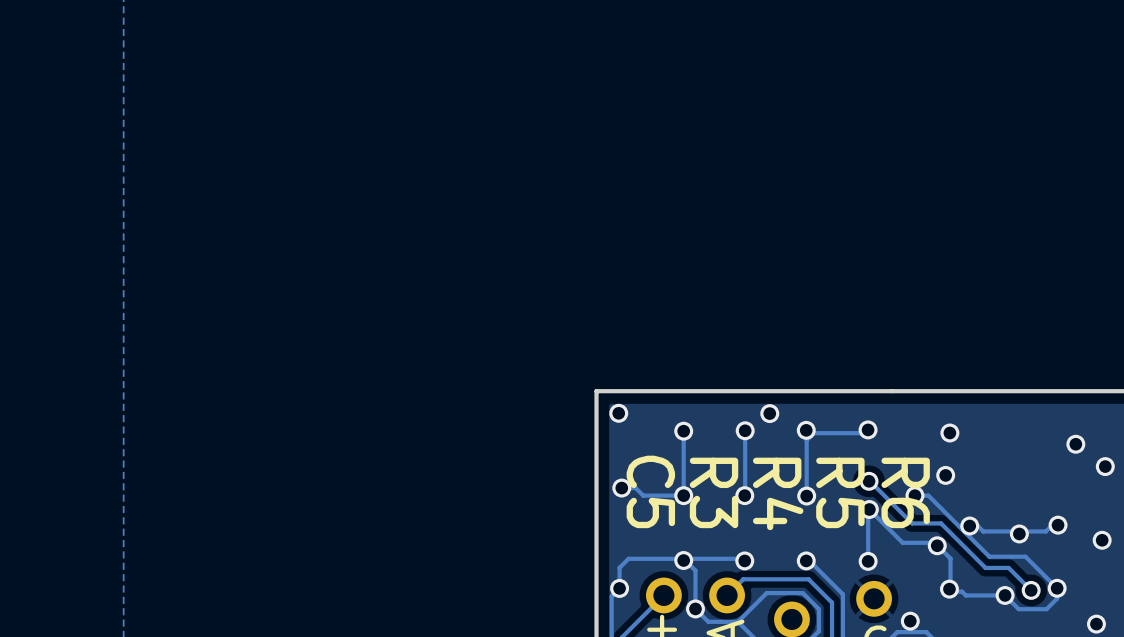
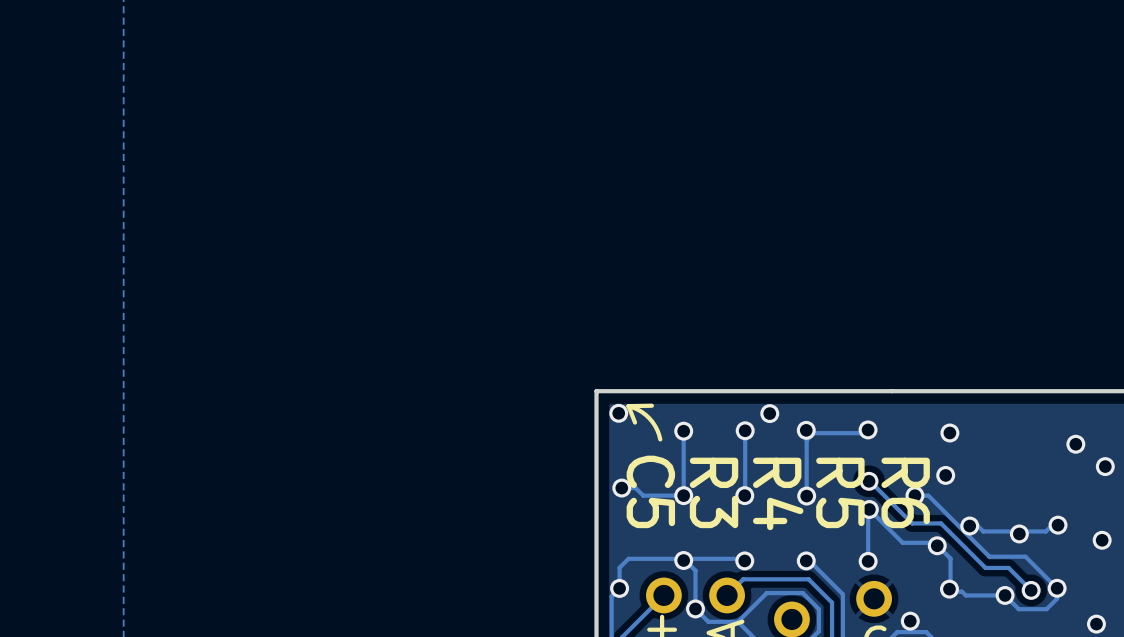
line: none -> (651, 405) (628, 406)
line: none -> (628, 406) (635, 422)
line: none -> (628, 406) (641, 411) (649, 418) (657, 430) (660, 439)

